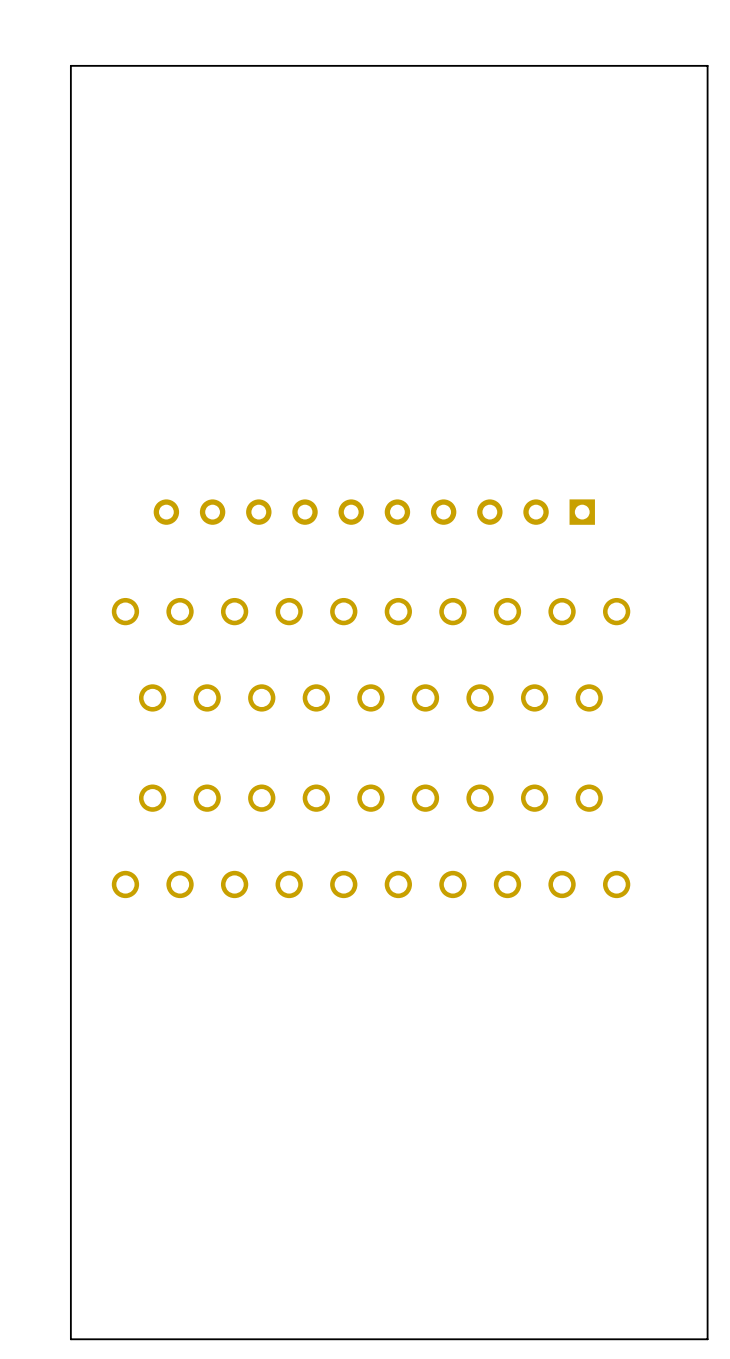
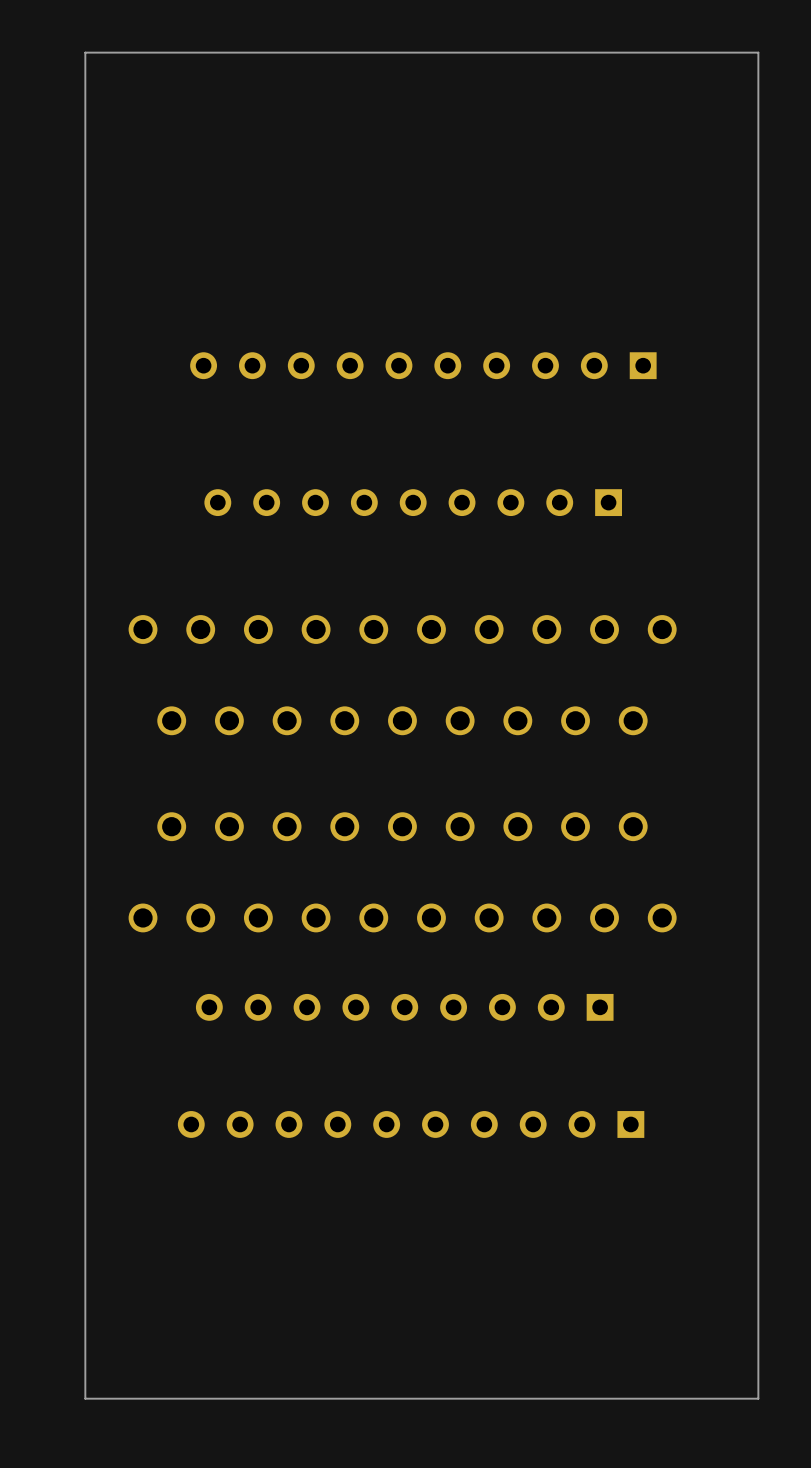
part: none -> (413, 502)
part position: (374, 512) -> (423, 365)
part: none -> (404, 1007)
part: none -> (411, 1124)

